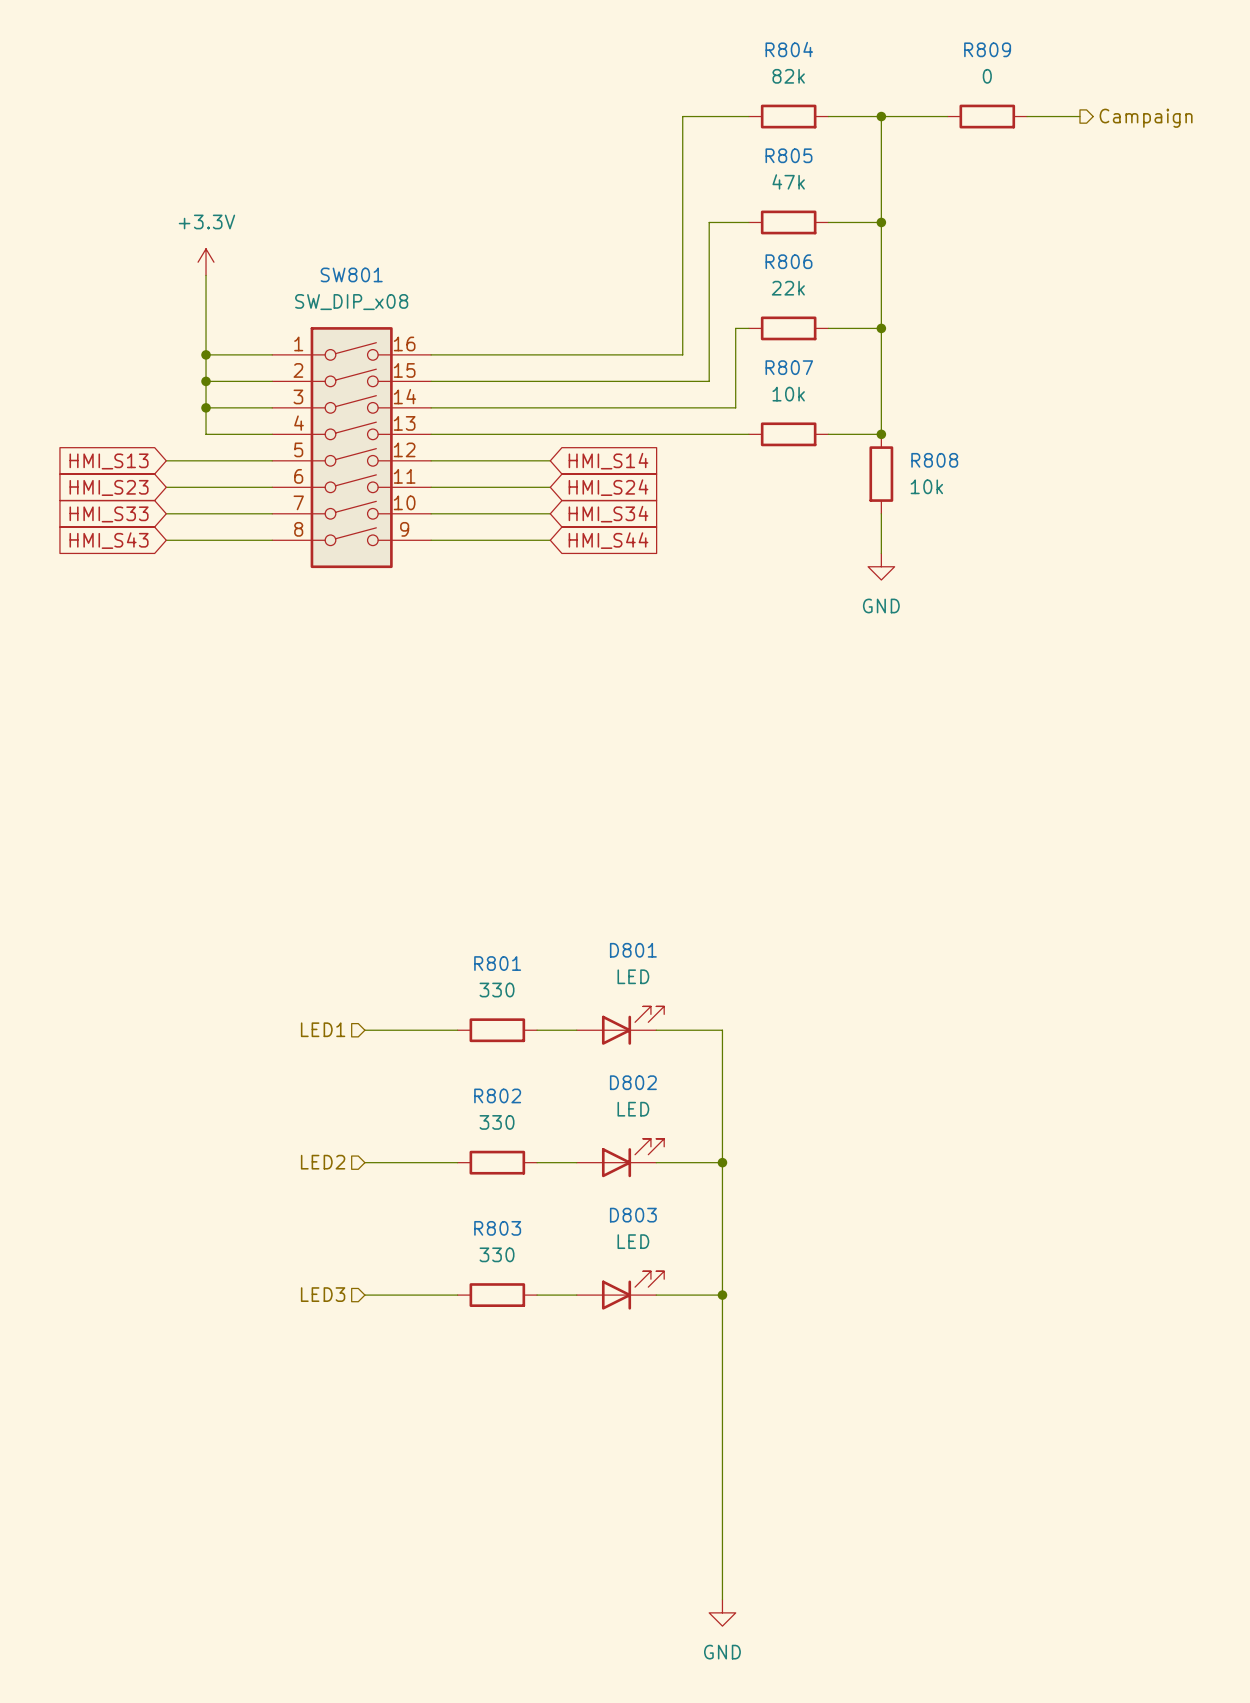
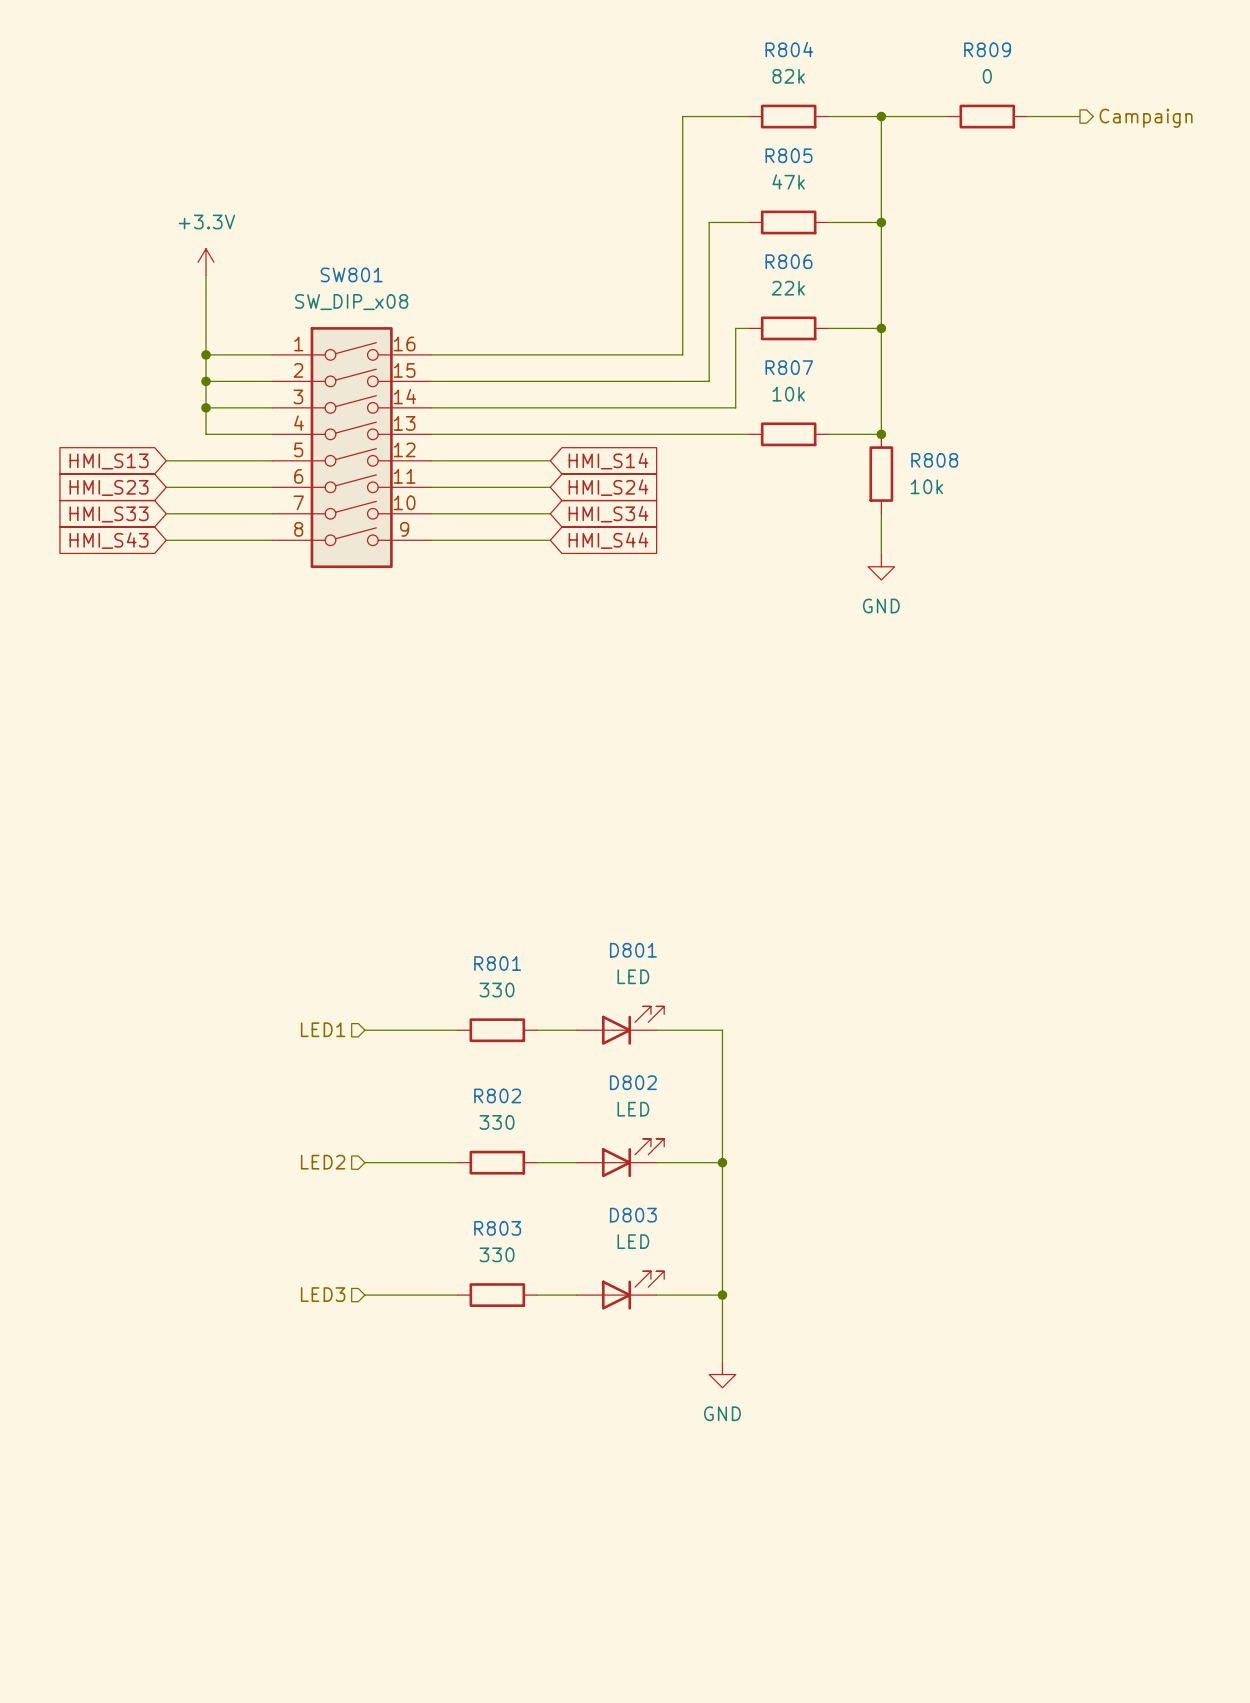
wire: (722, 1361) (722, 1599) -> none
power symbol position: GND (722, 1612) -> GND (722, 1374)

